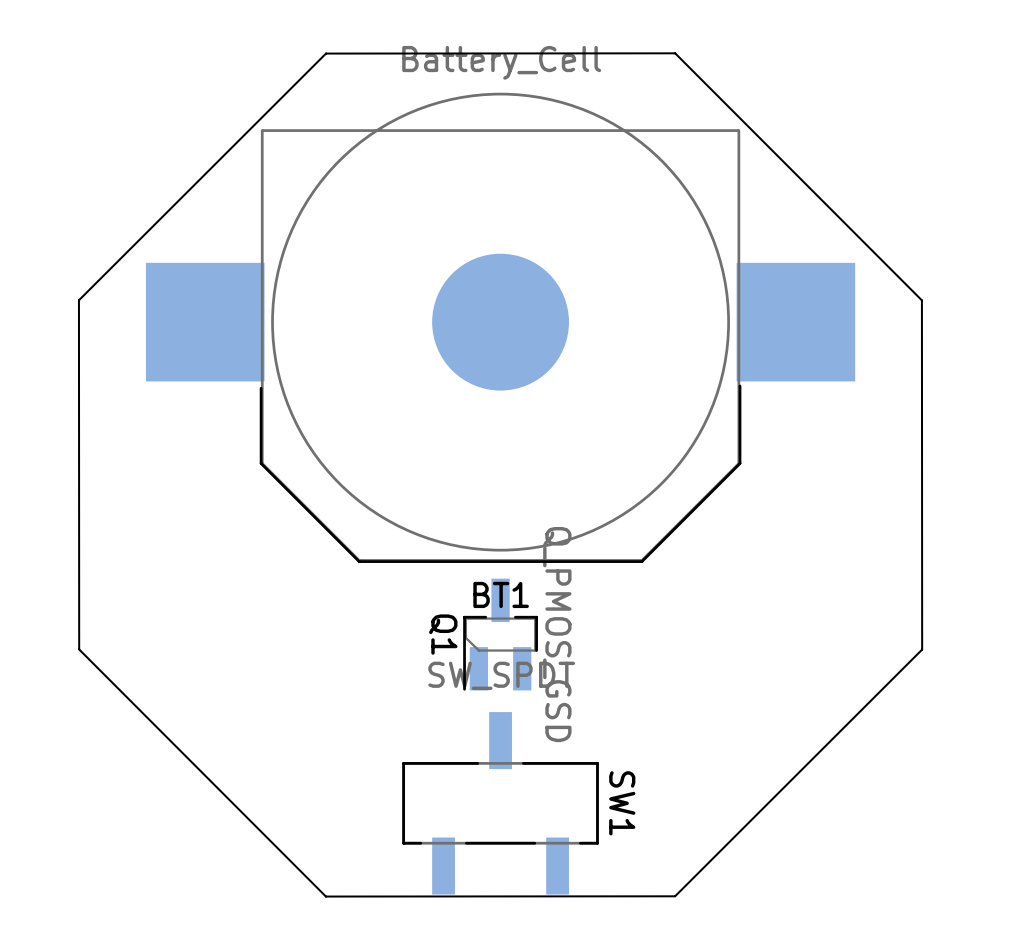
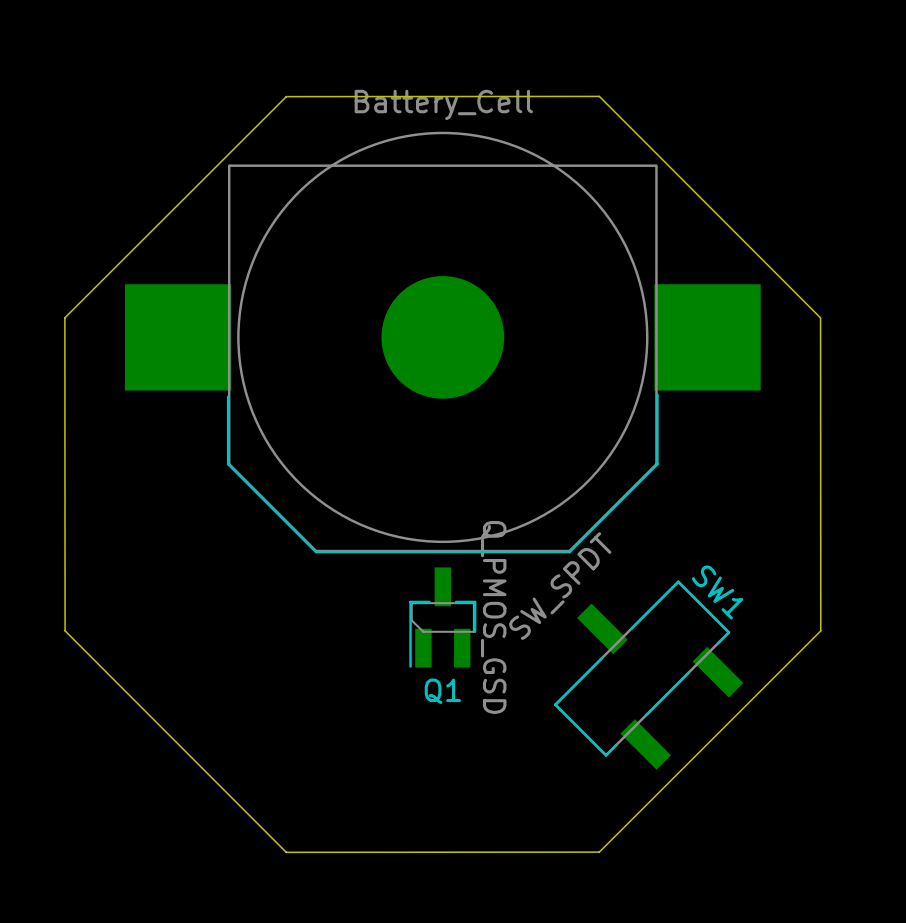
BT1 name: BT1 (501, 594) -> none
Q1 name rotation: 0° (443, 634) -> 90° counterclockwise (442, 691)
Q1 name position: Q1 (443, 634) -> Q1 (442, 691)
SW1 rotation: 0° (500, 803) -> 45° counterclockwise (648, 675)
SW1 position: (500, 803) -> (648, 675)

